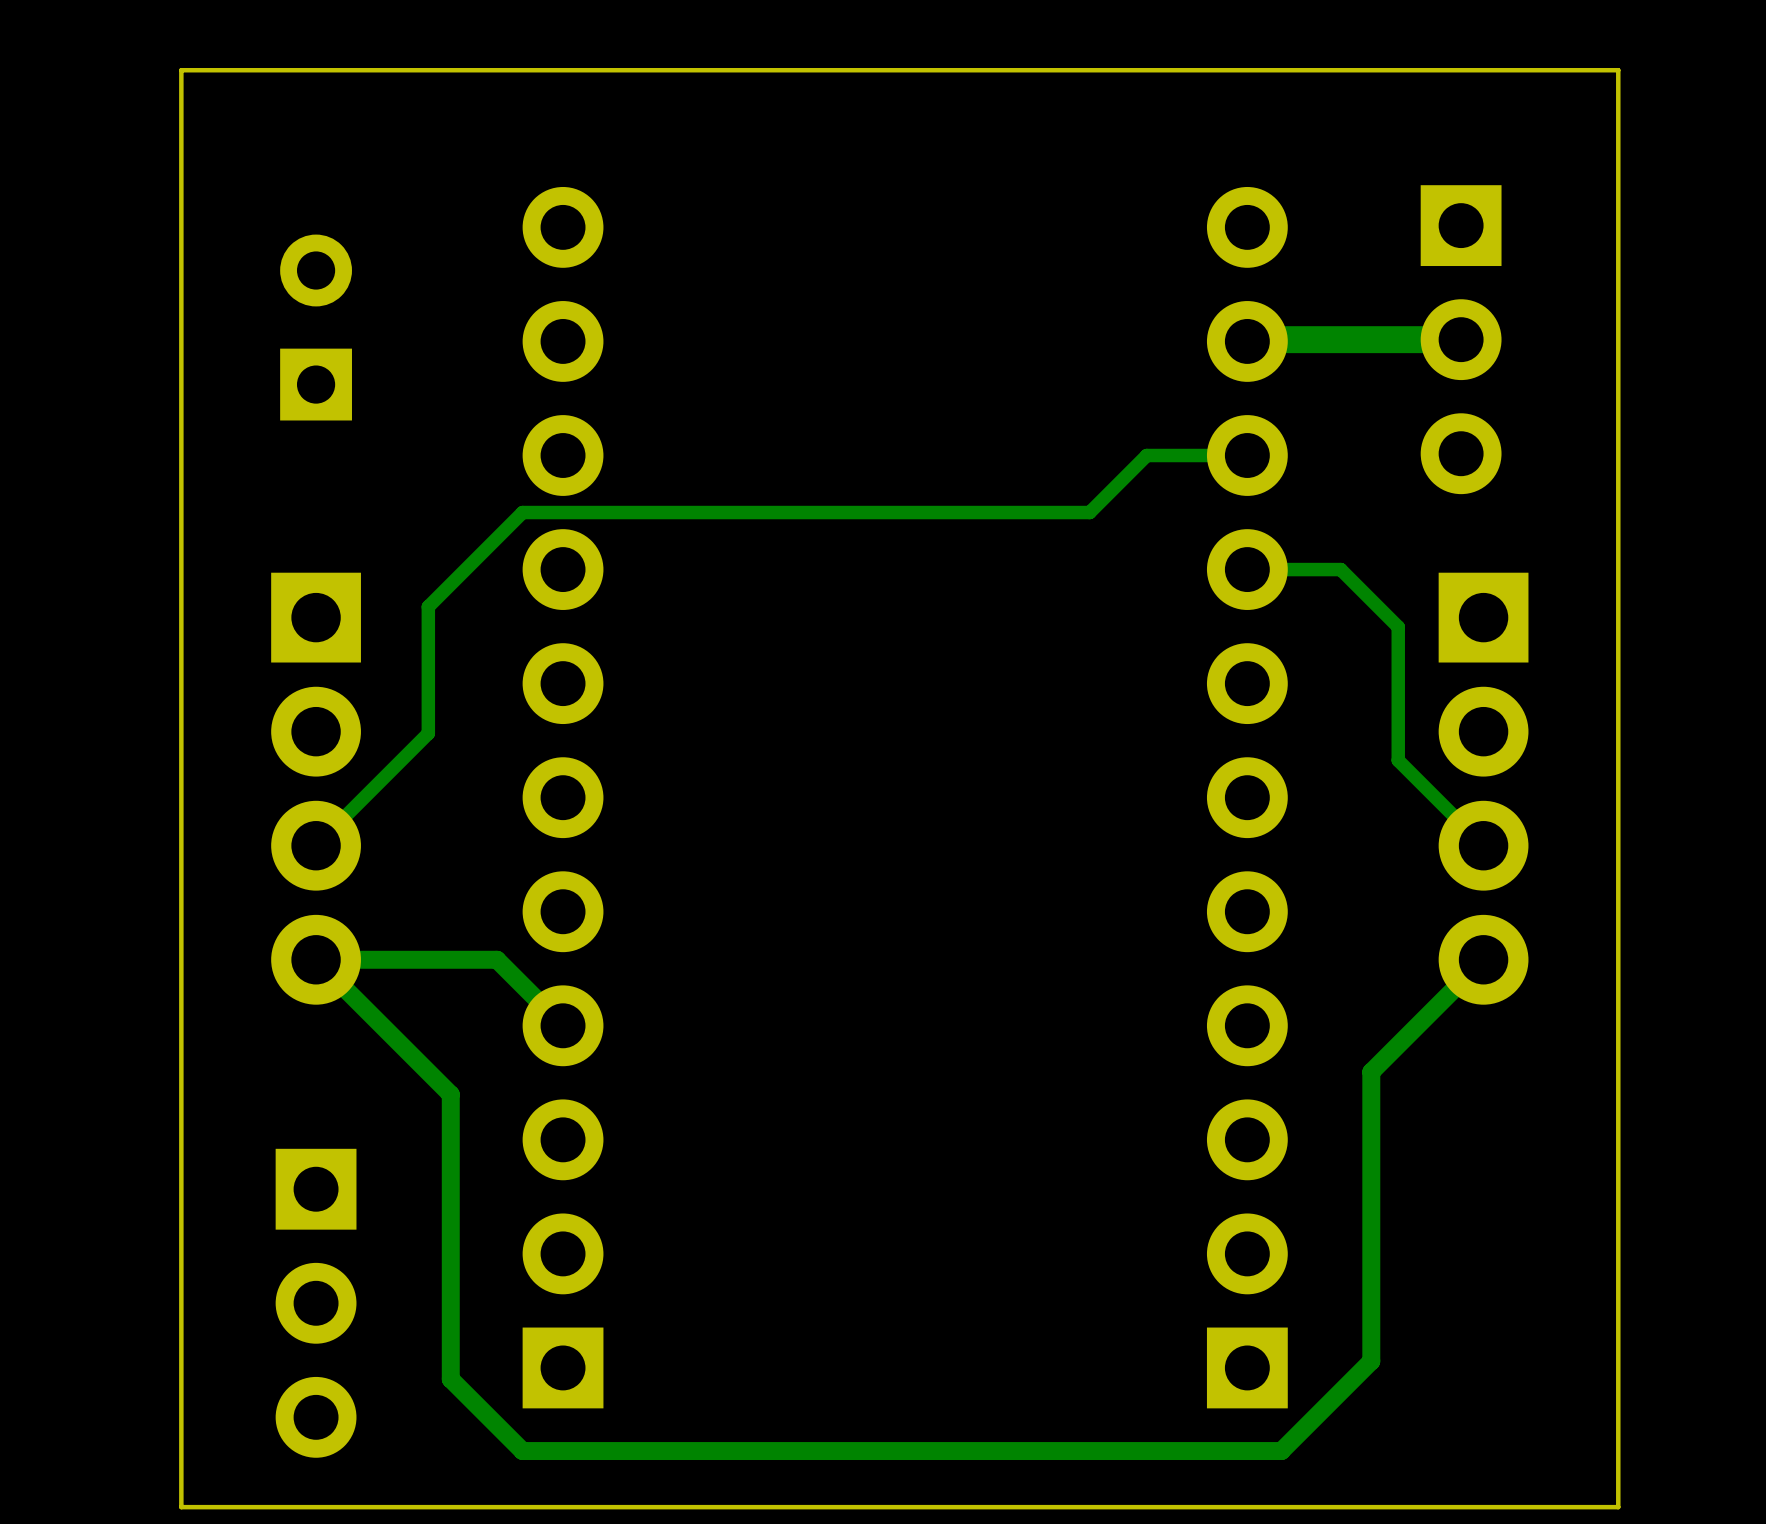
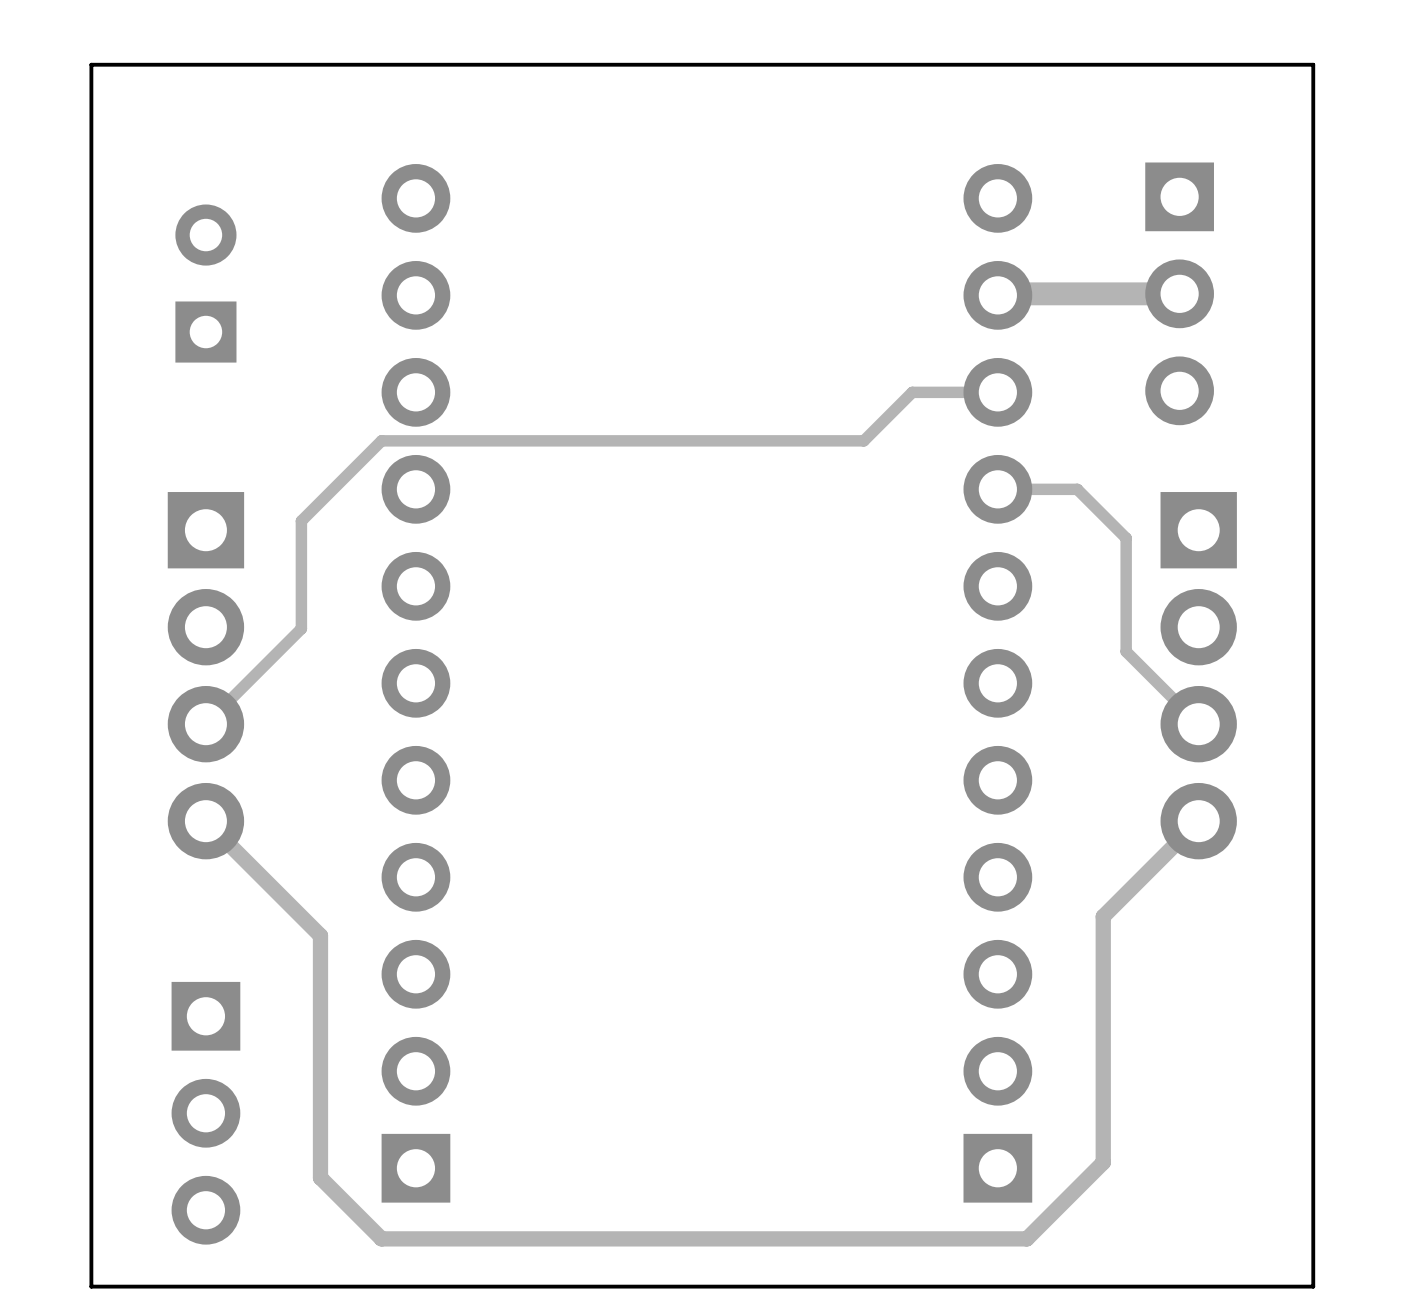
track: (316, 959) (497, 959) (563, 1025) -> none

